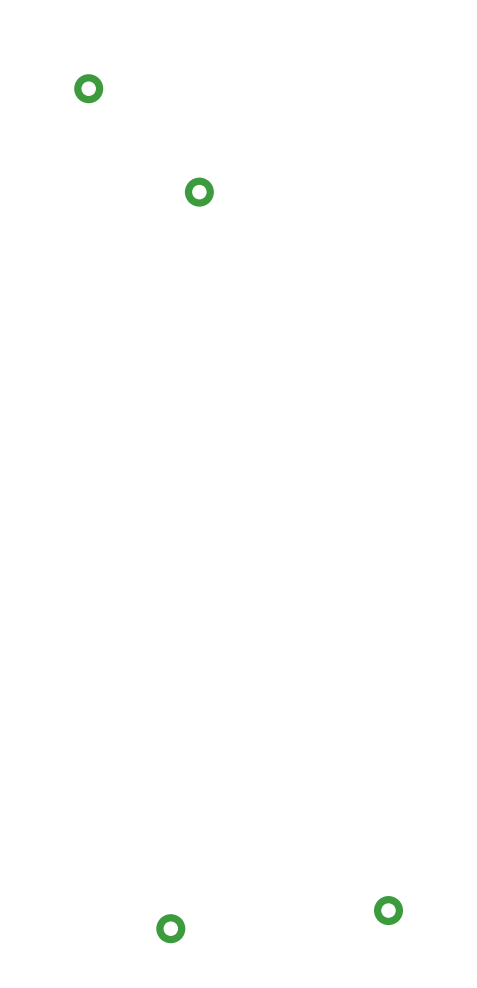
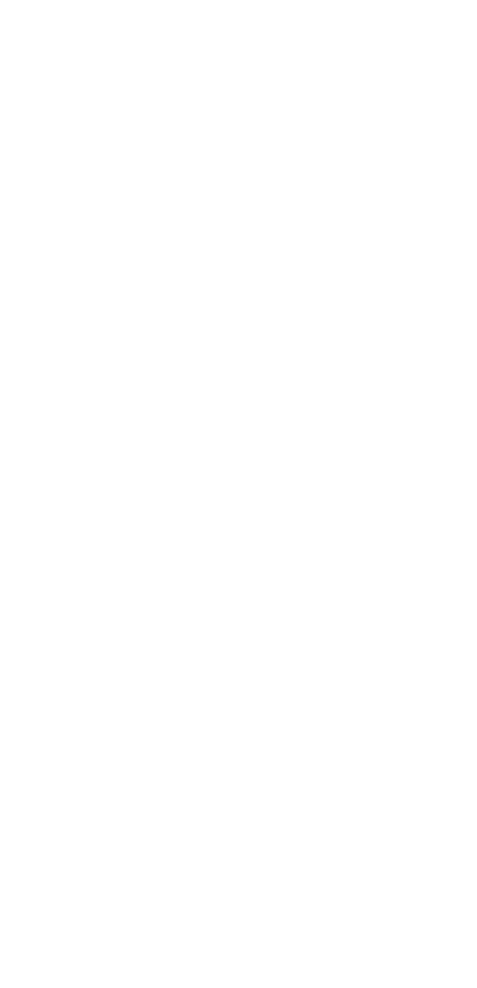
via: (88, 88) -> none
via: (199, 192) -> none
via: (388, 910) -> none
via: (170, 928) -> none

